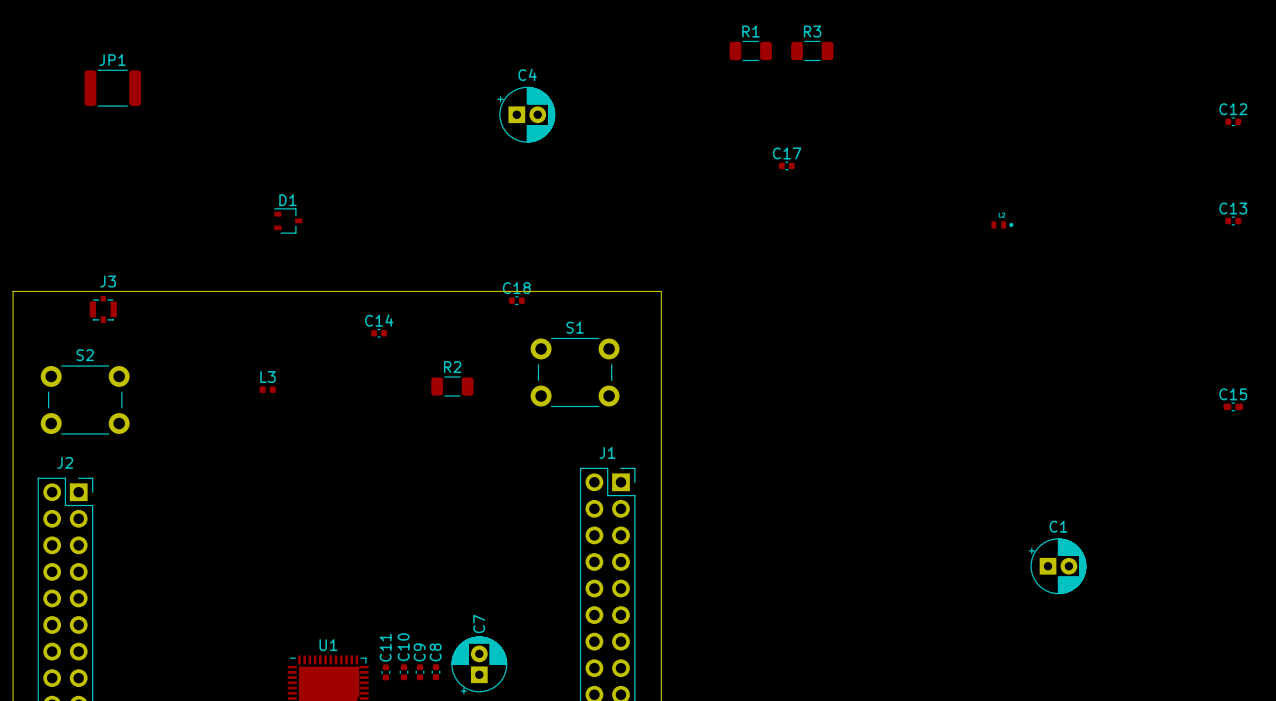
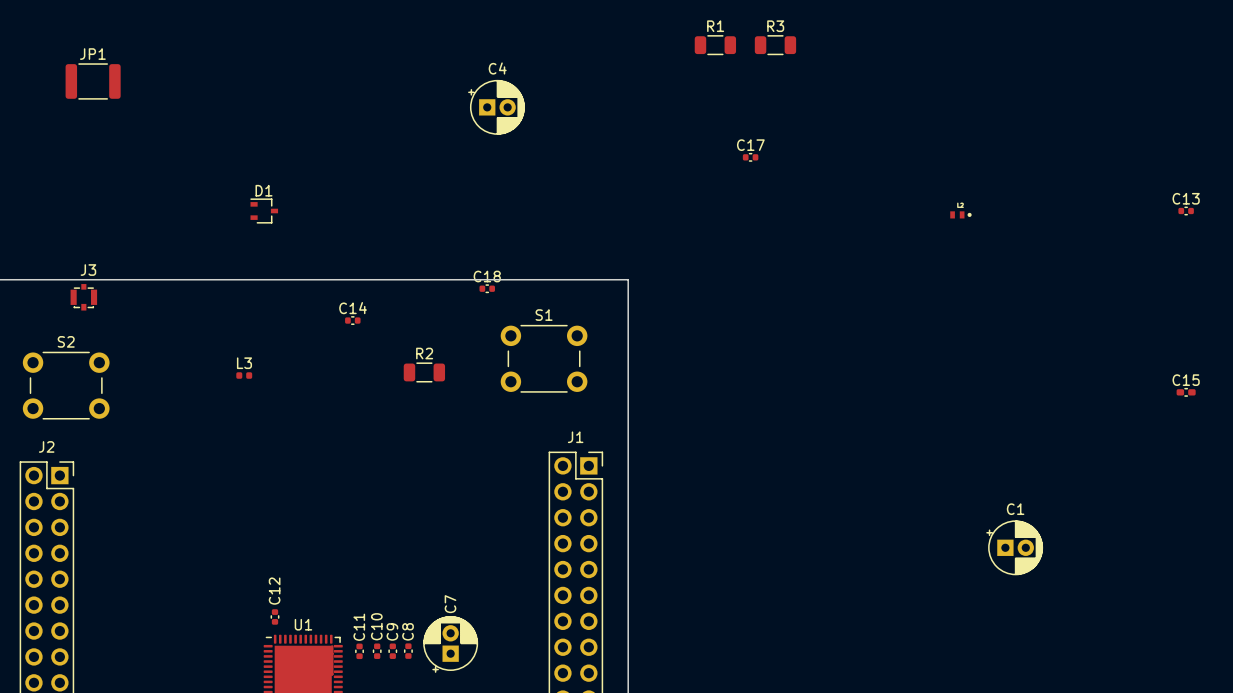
C12 rotation: 0° (1233, 121) -> 90° clockwise (274, 616)
C12 position: (1233, 121) -> (274, 616)

